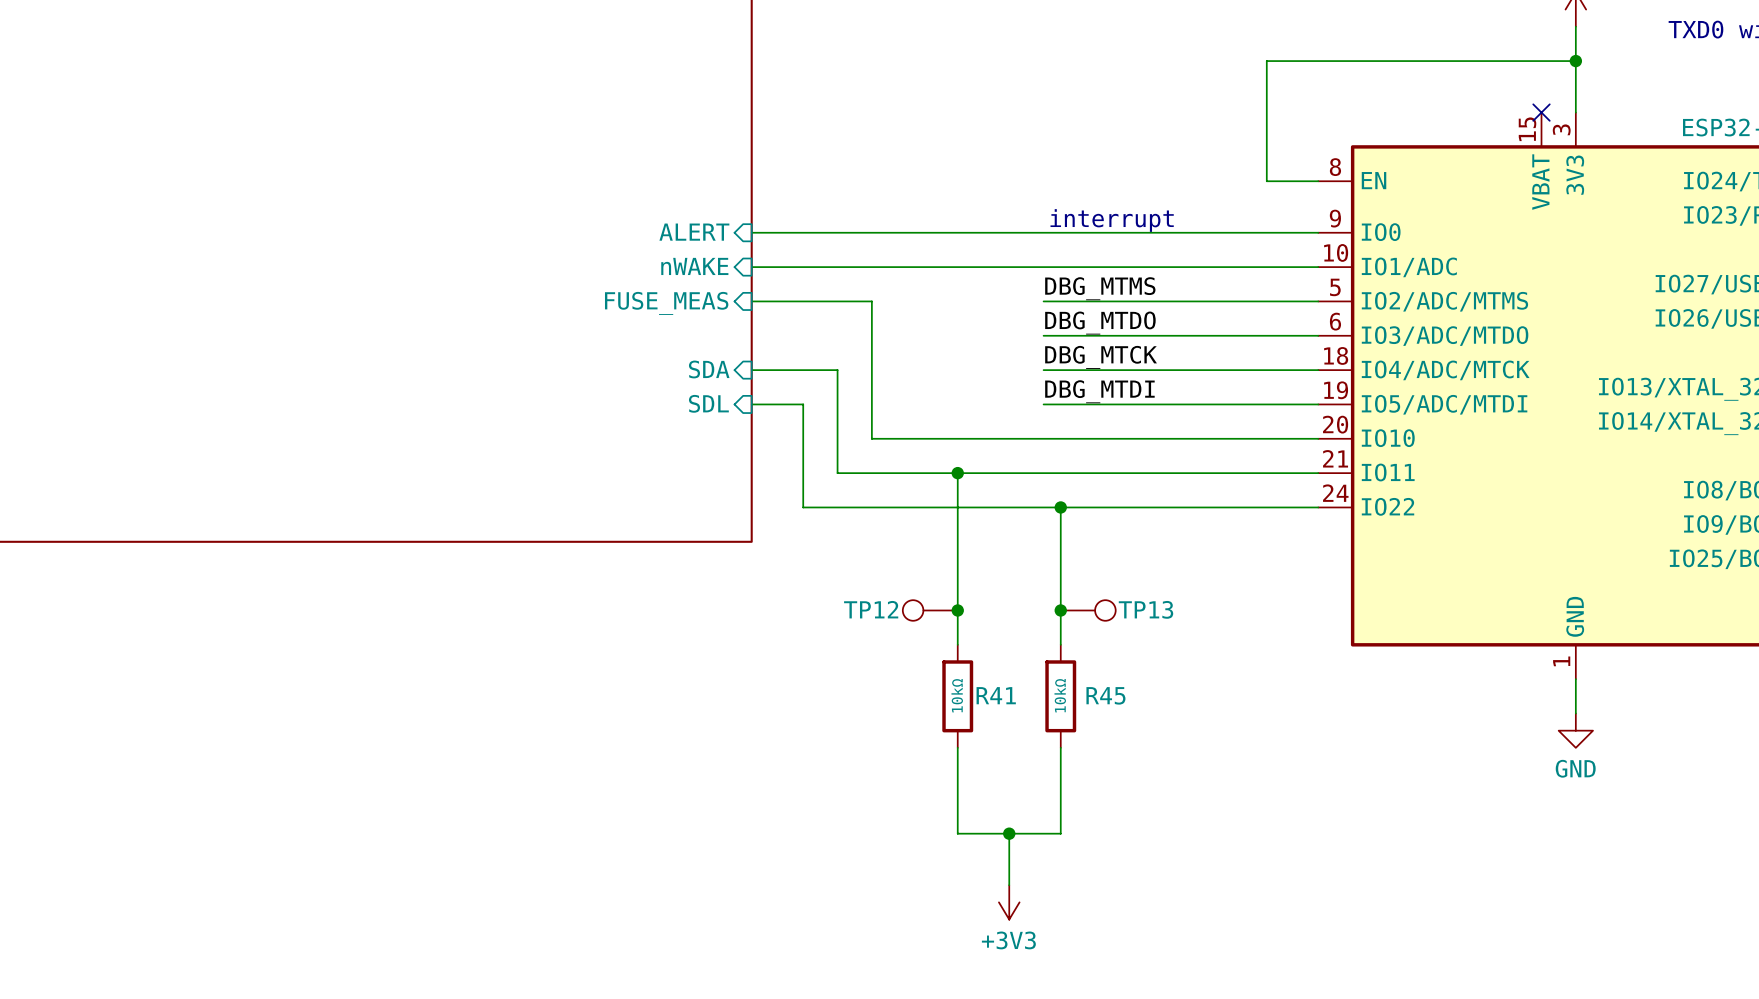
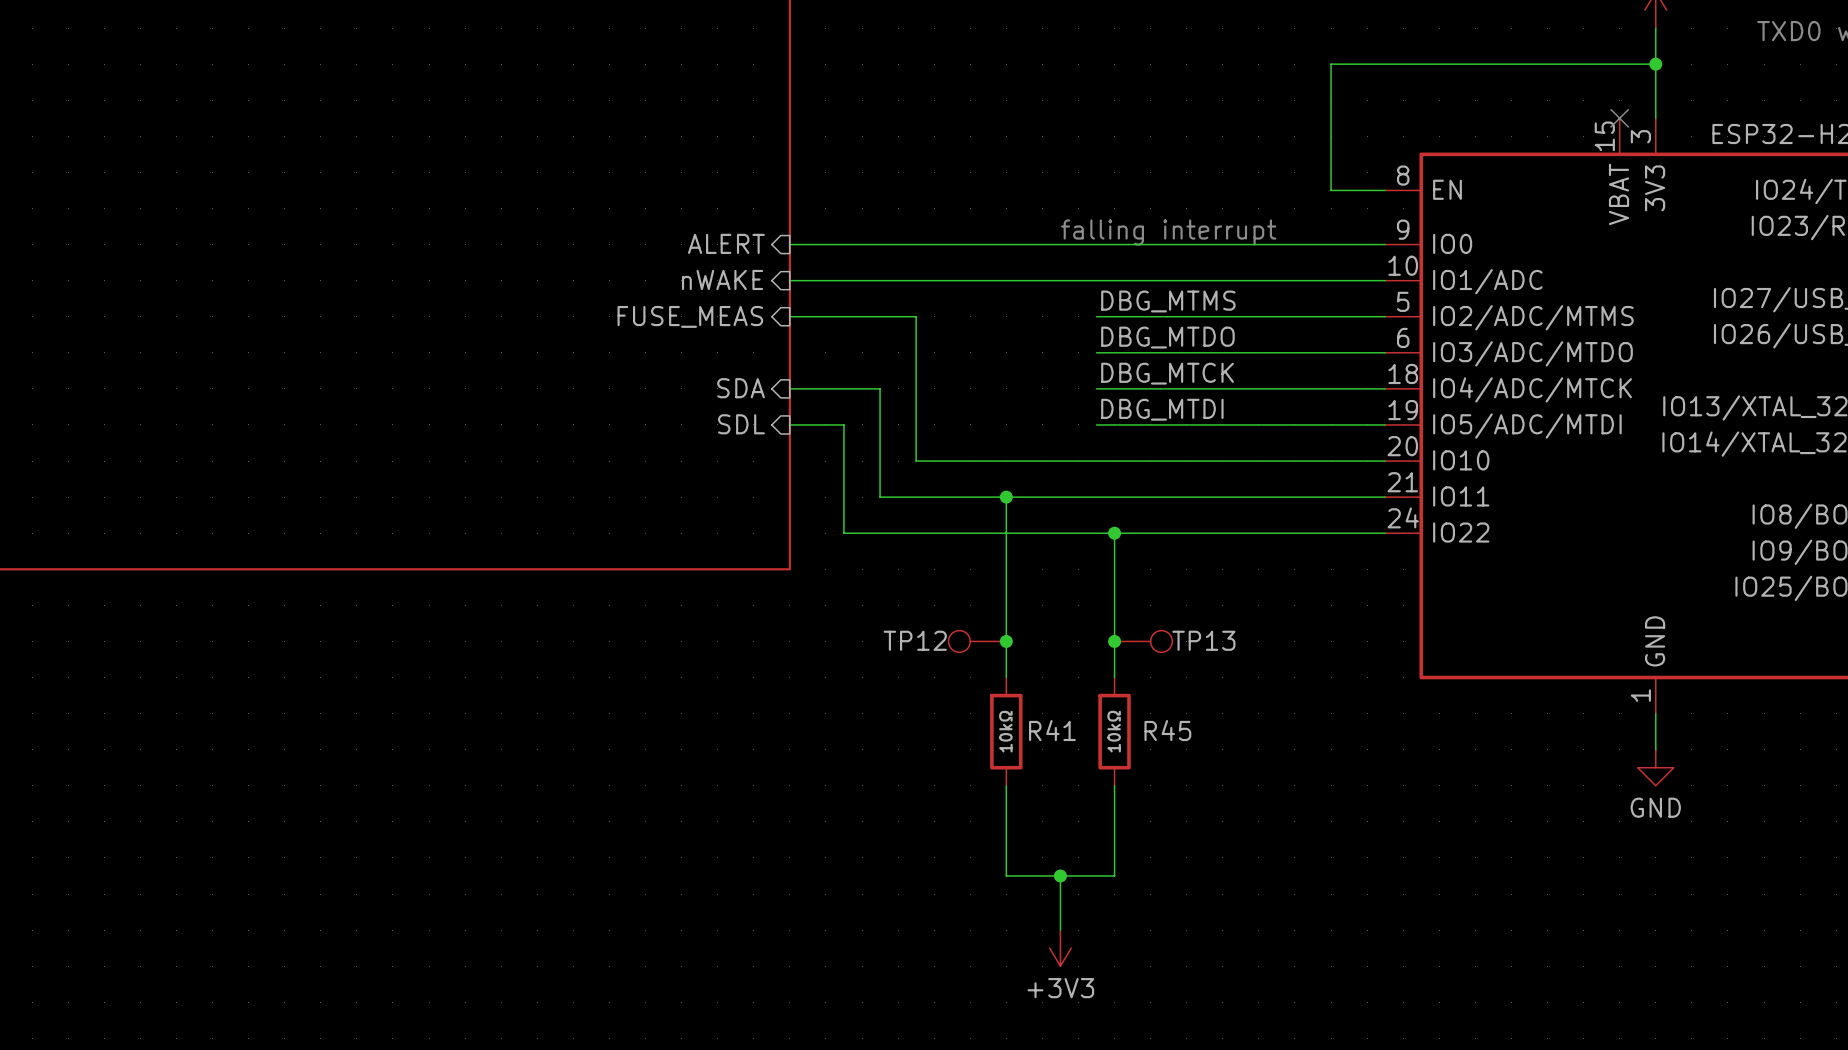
text: interrupt (1112, 220) -> falling interrupt (1168, 232)

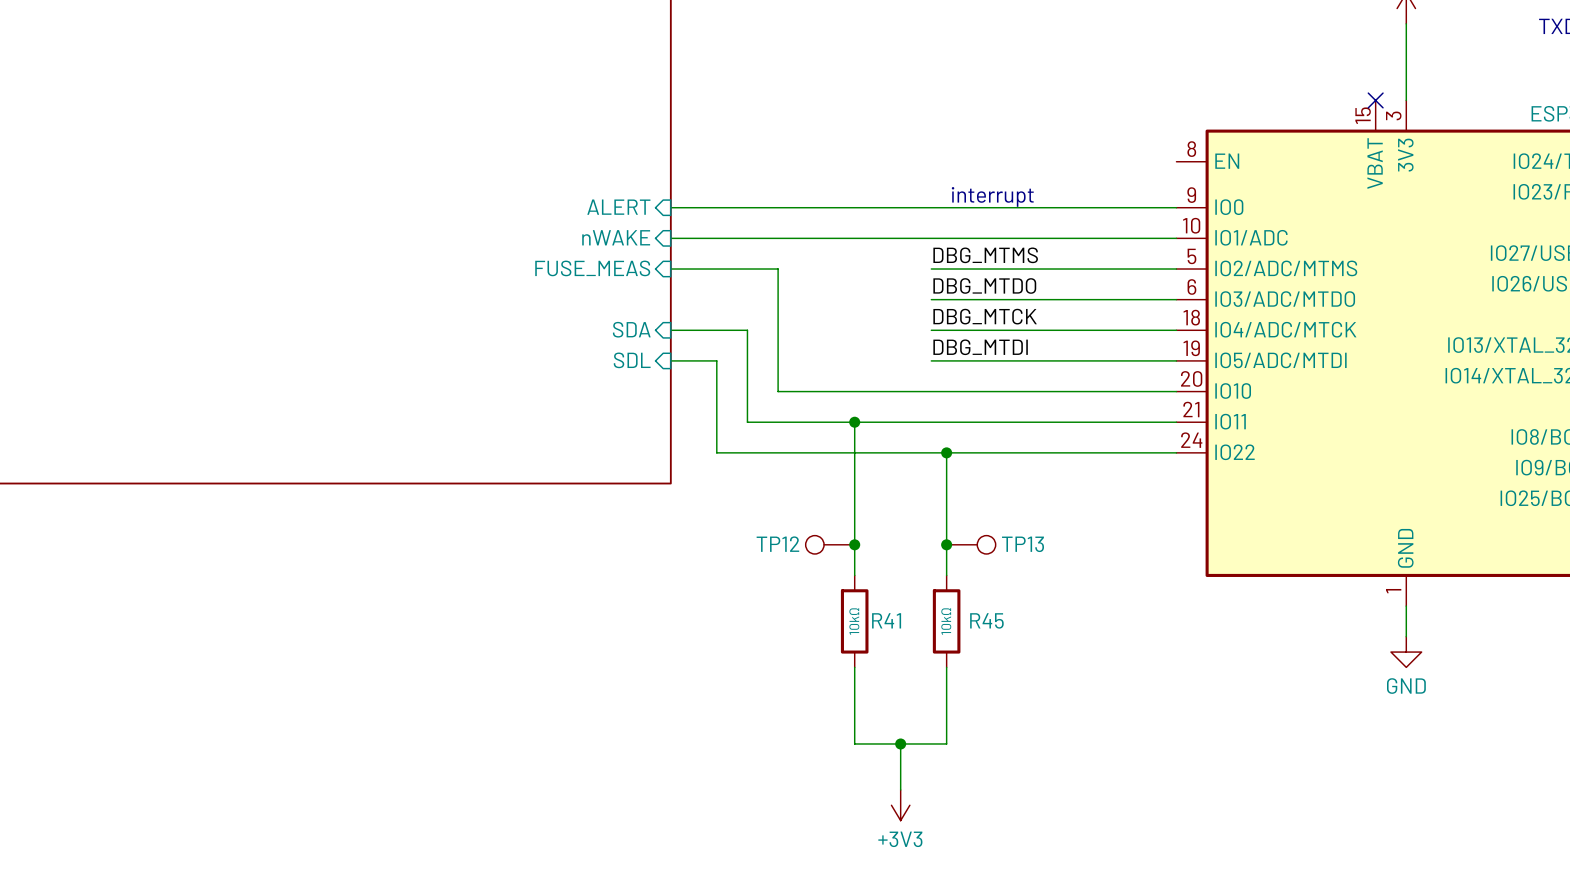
wire: (1655, 64) (1331, 64) (1331, 190) (1385, 190) -> none
junction: (1655, 64) -> none
text: falling interrupt (1168, 232) -> interrupt (992, 196)

